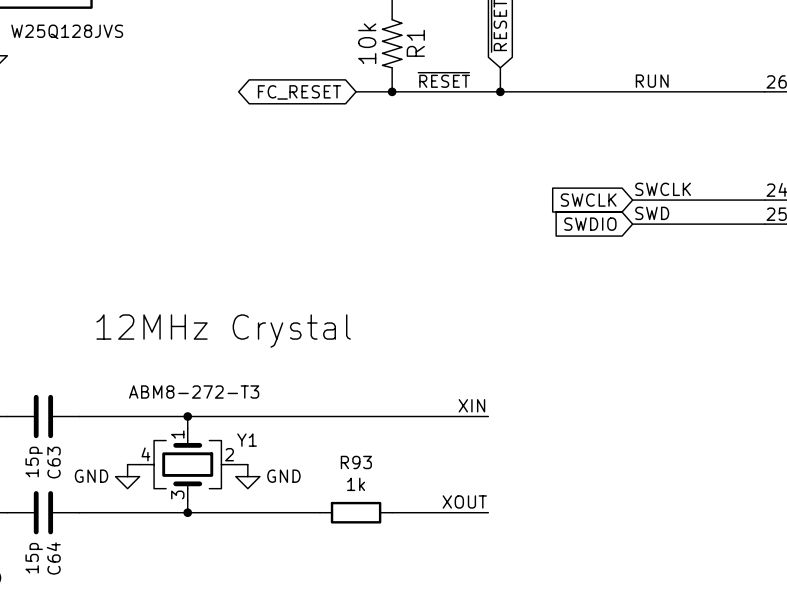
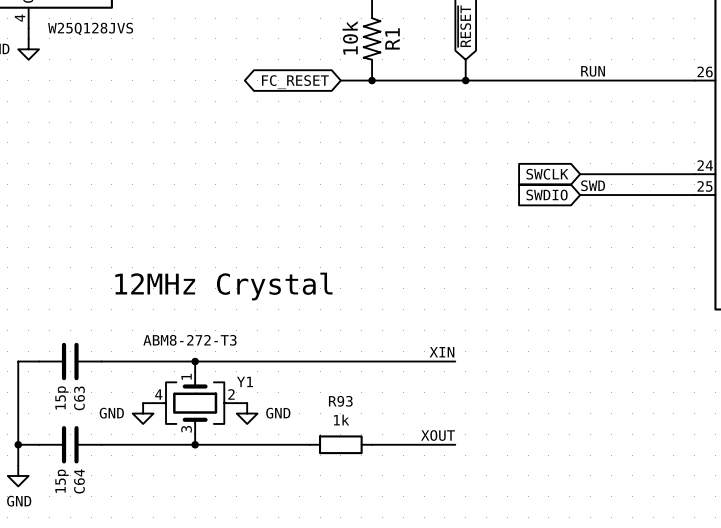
label: ~{RESET} (443, 79) -> none
label: SWCLK (663, 189) -> none

